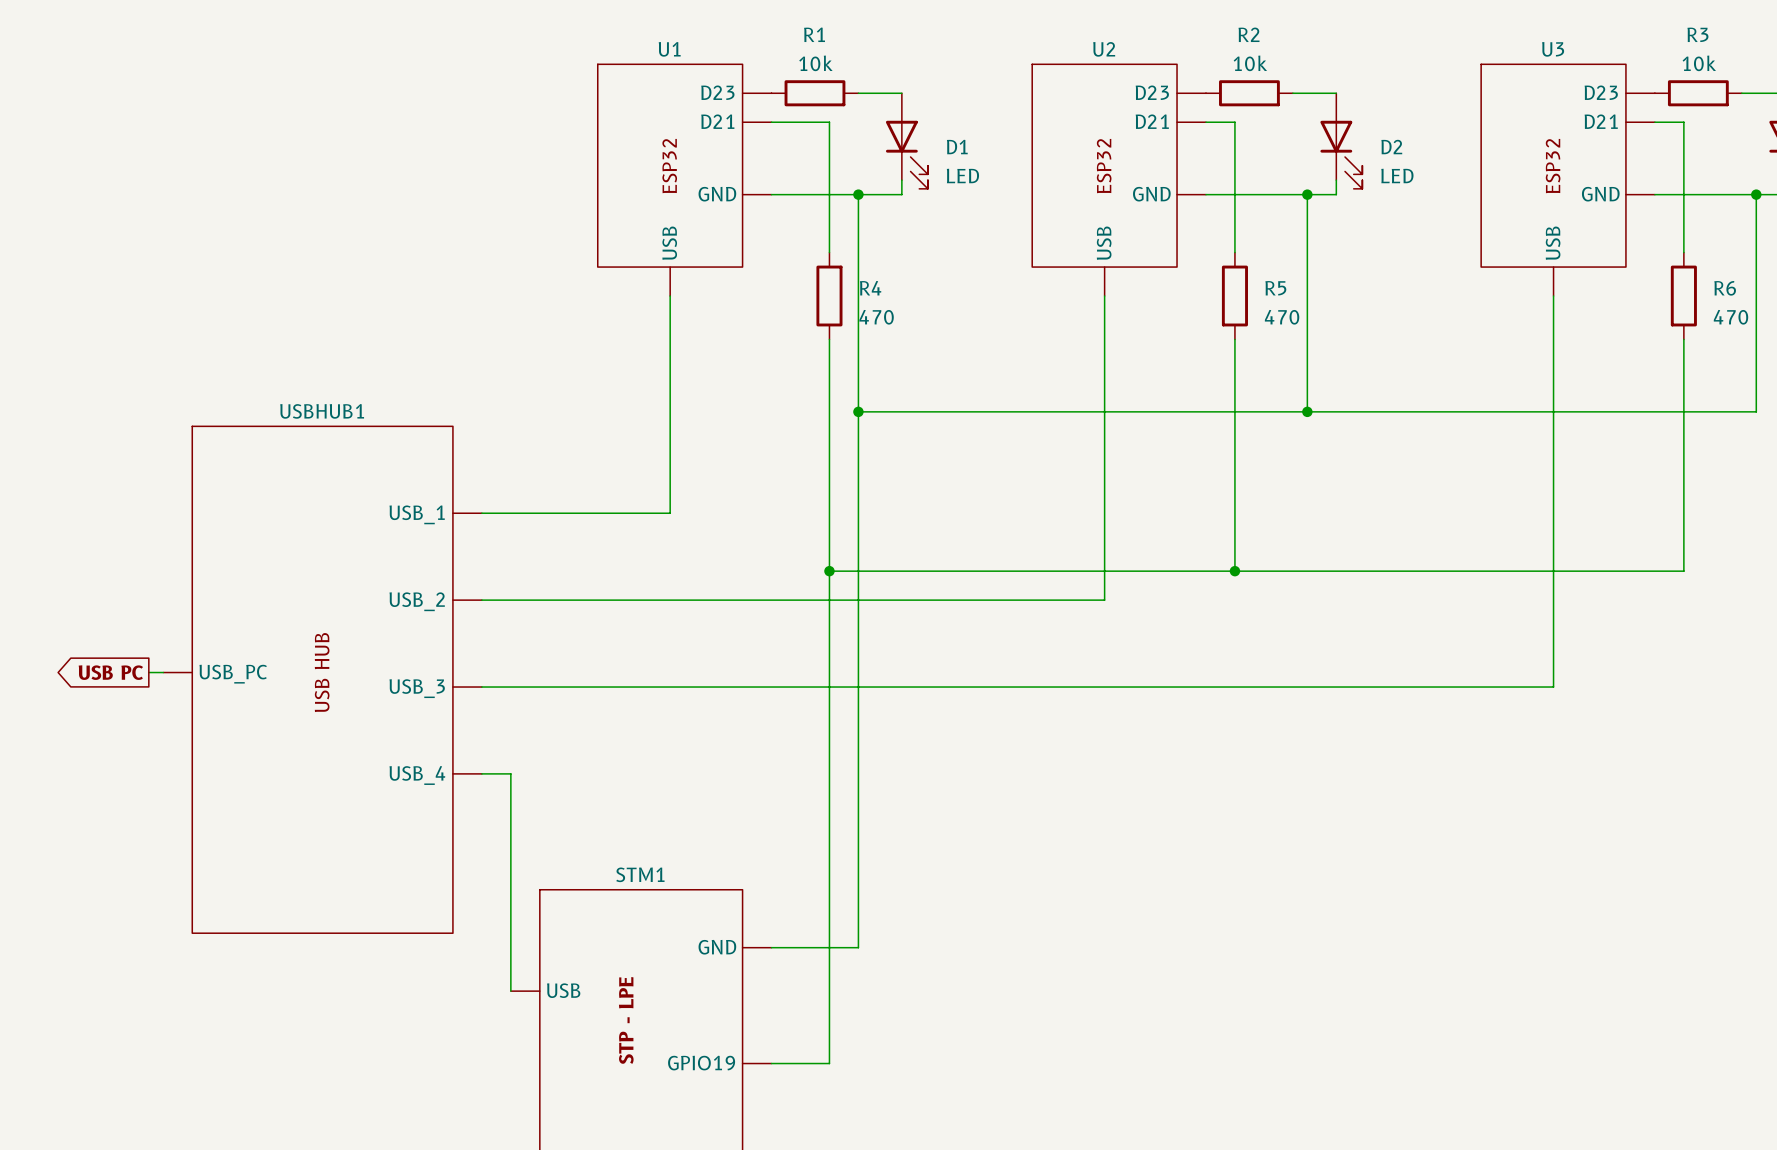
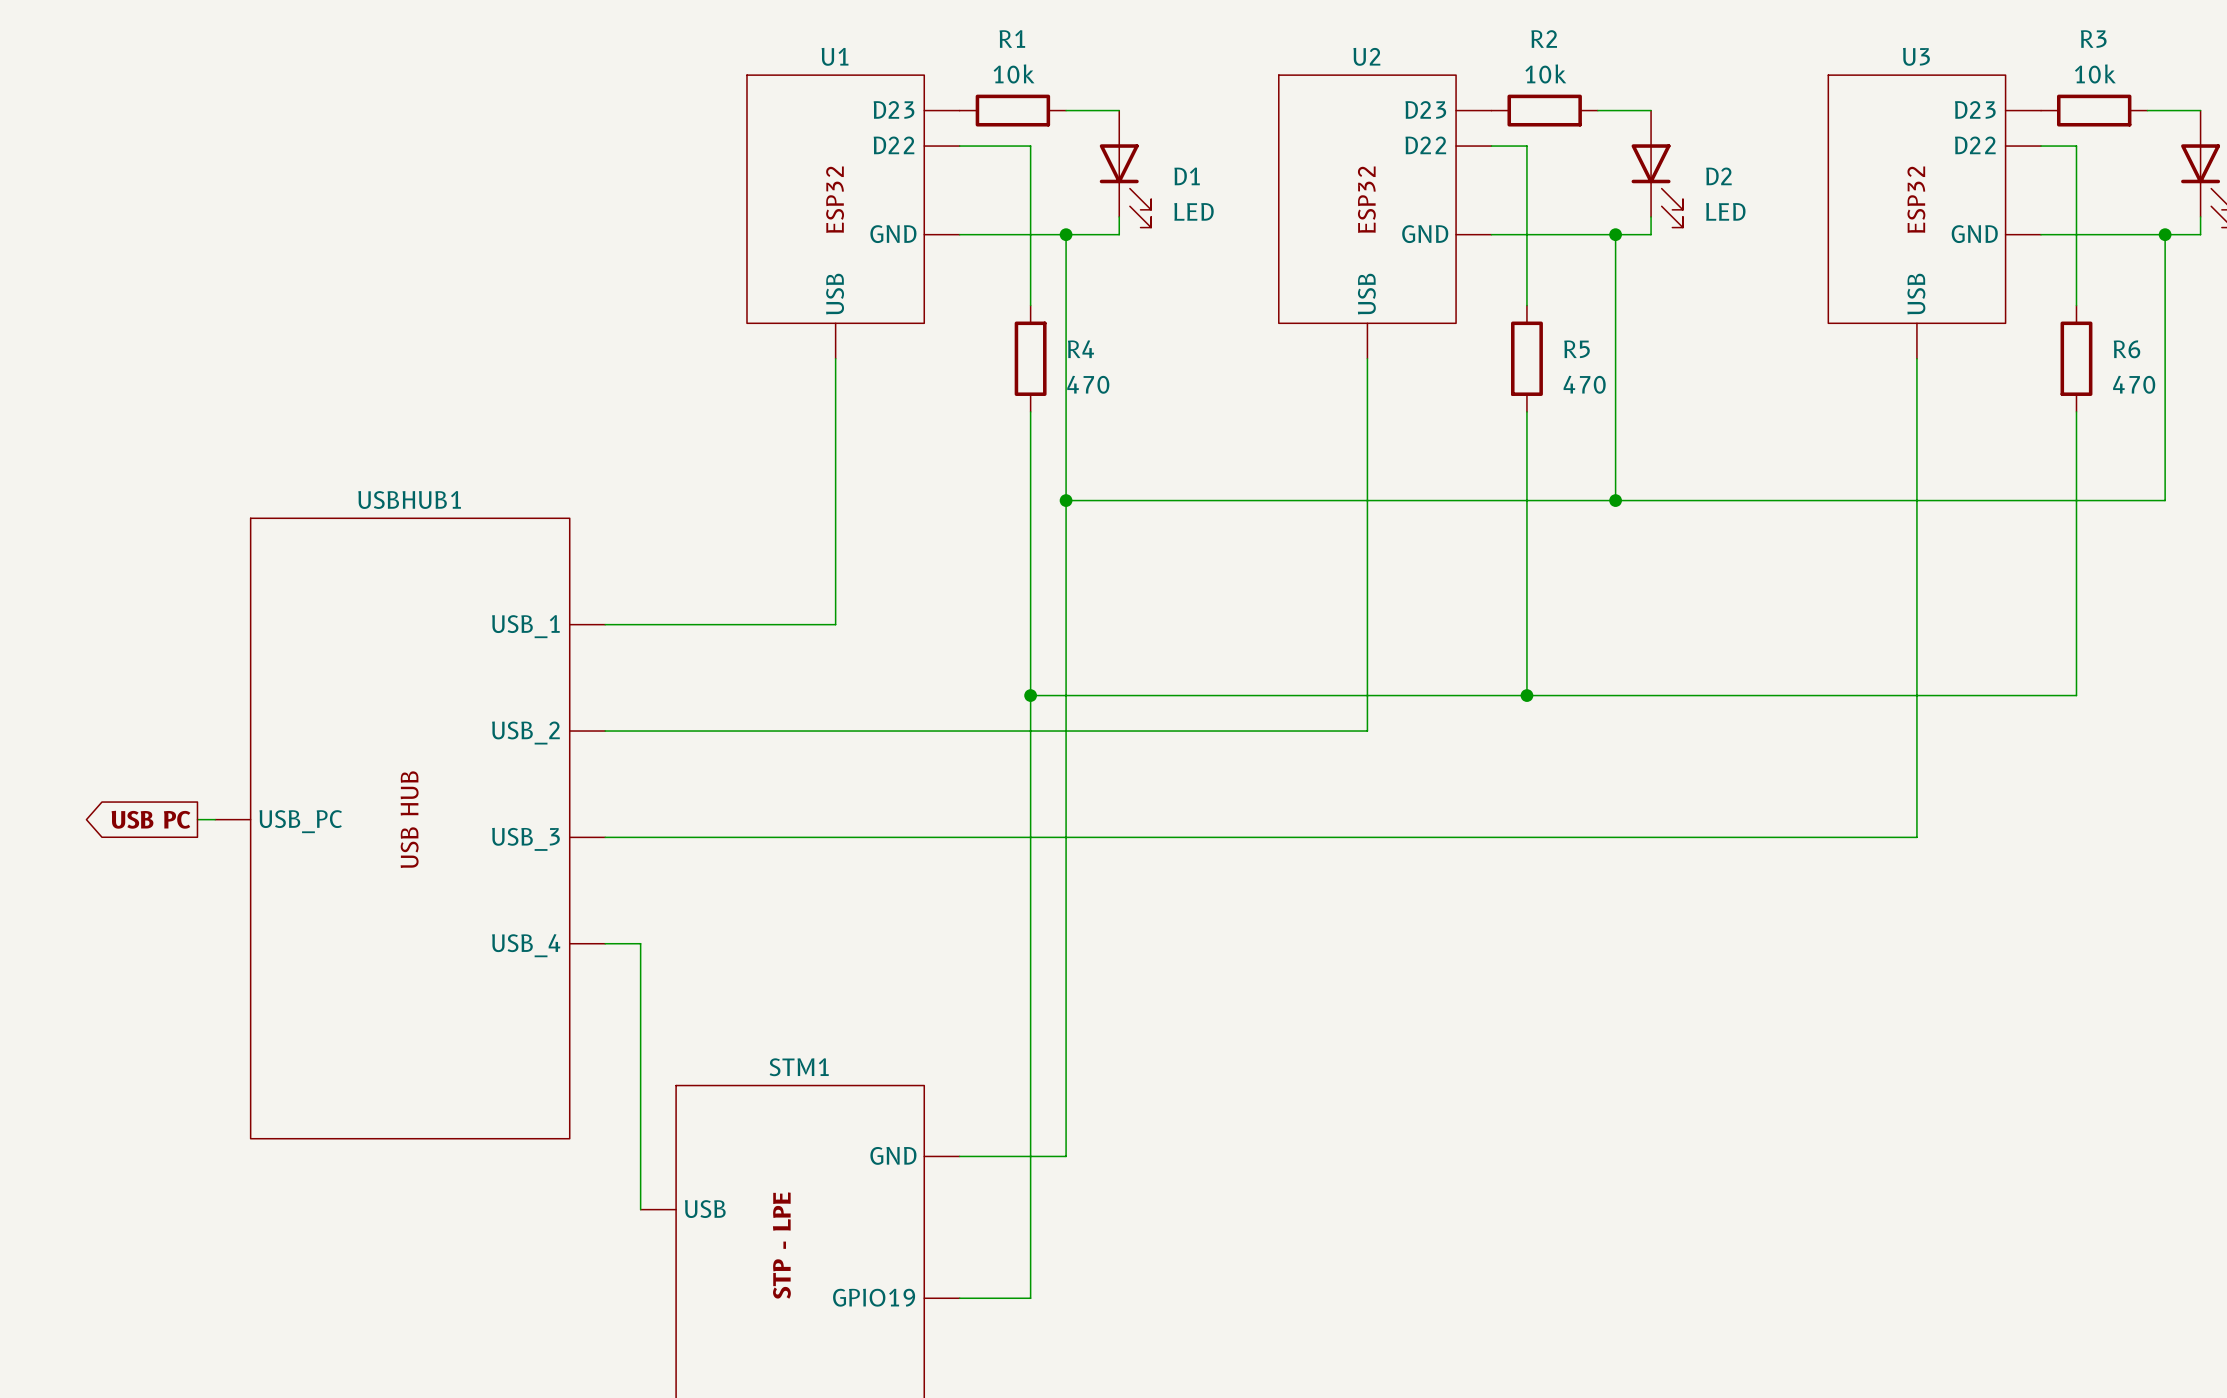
U1 pin name: D21 (717, 121) -> D22 (893, 145)
U2 pin name: D21 (1152, 121) -> D22 (1425, 145)
U3 pin name: D21 (1601, 121) -> D22 (1975, 145)

